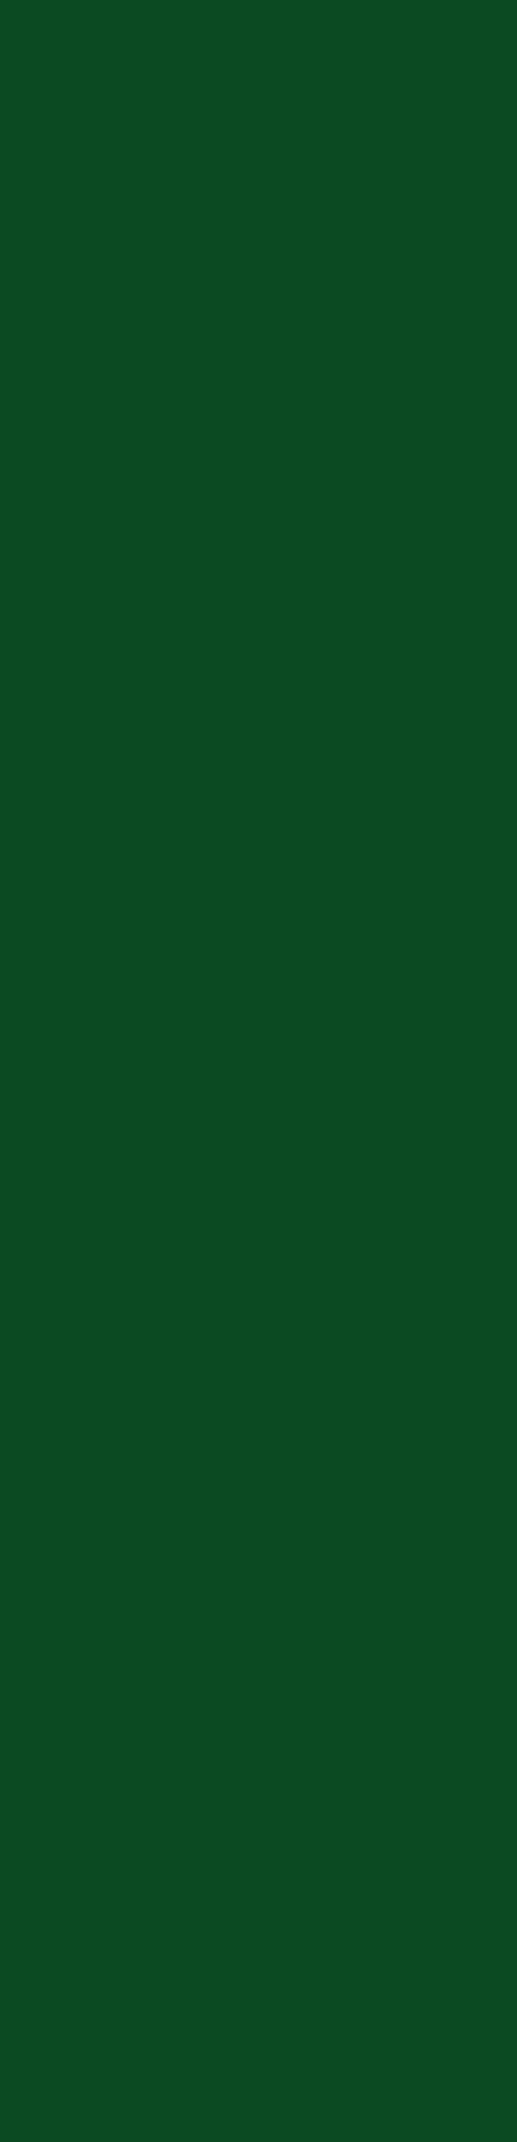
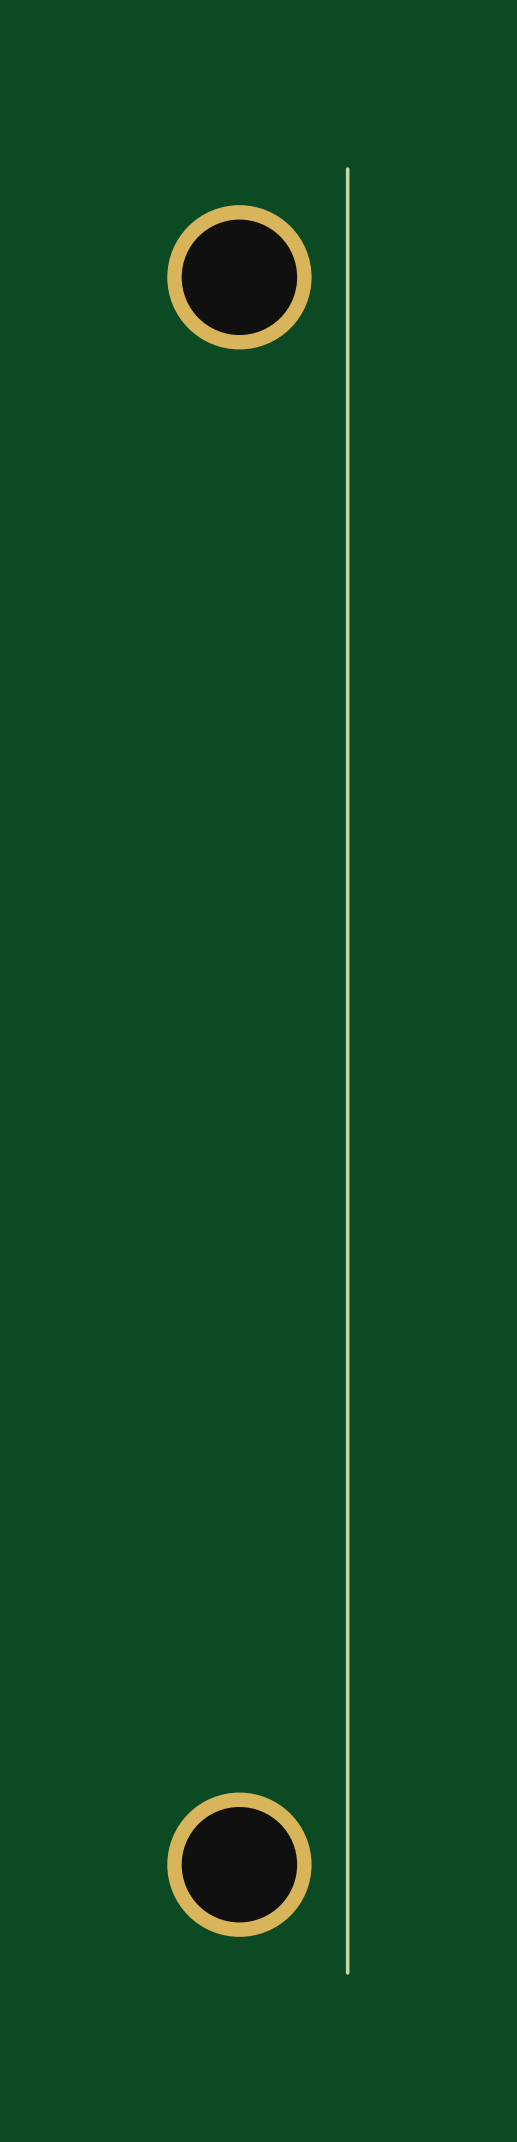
board edge: none -> (347, 169) (347, 1972)
part: none -> (239, 277)
part: none -> (239, 1864)

